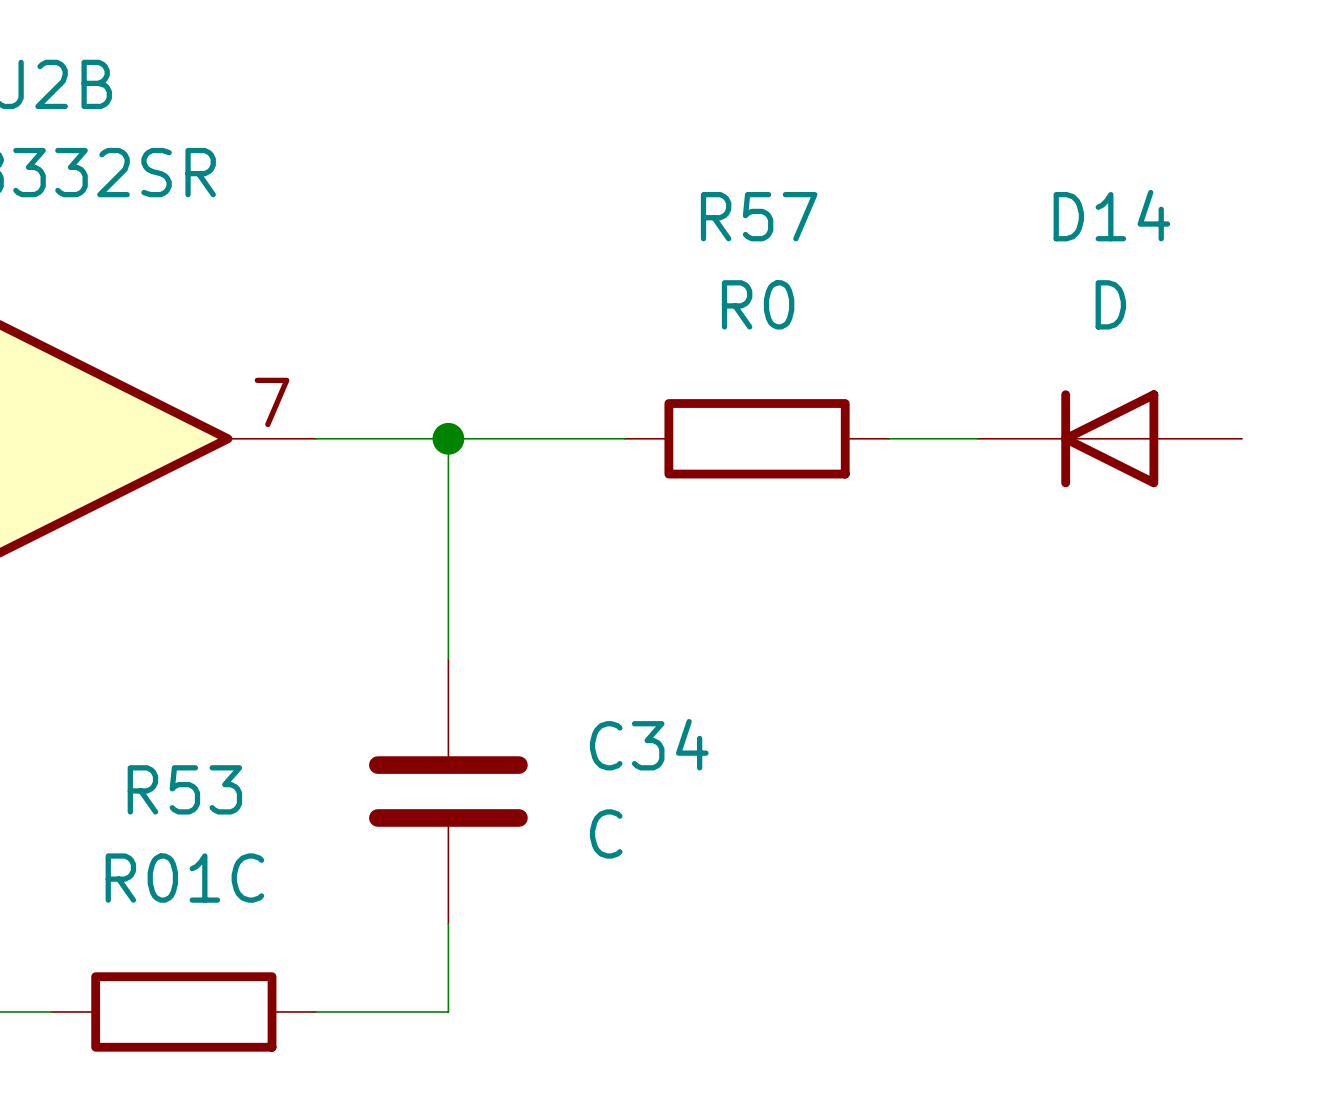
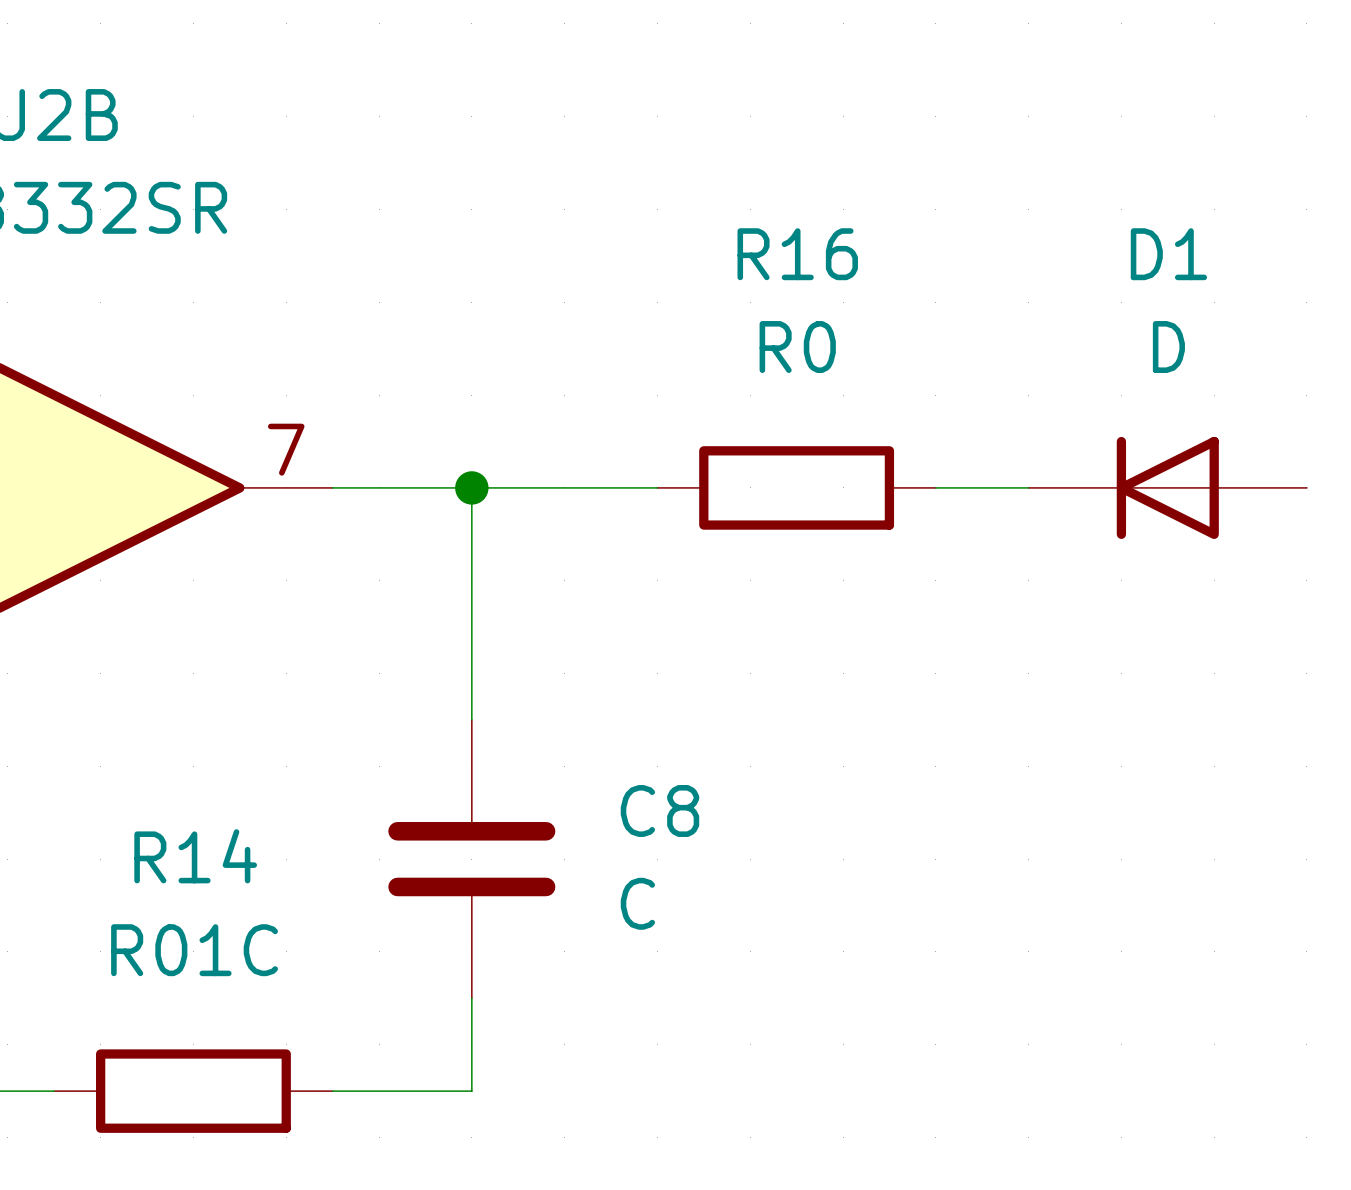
D14 name: D14 (1111, 215) -> D1 (1168, 254)
R57 name: R57 (759, 216) -> R16 (797, 254)
C34 name: C34 (649, 744) -> C8 (659, 810)
R53 name: R53 (184, 789) -> R14 (195, 856)

